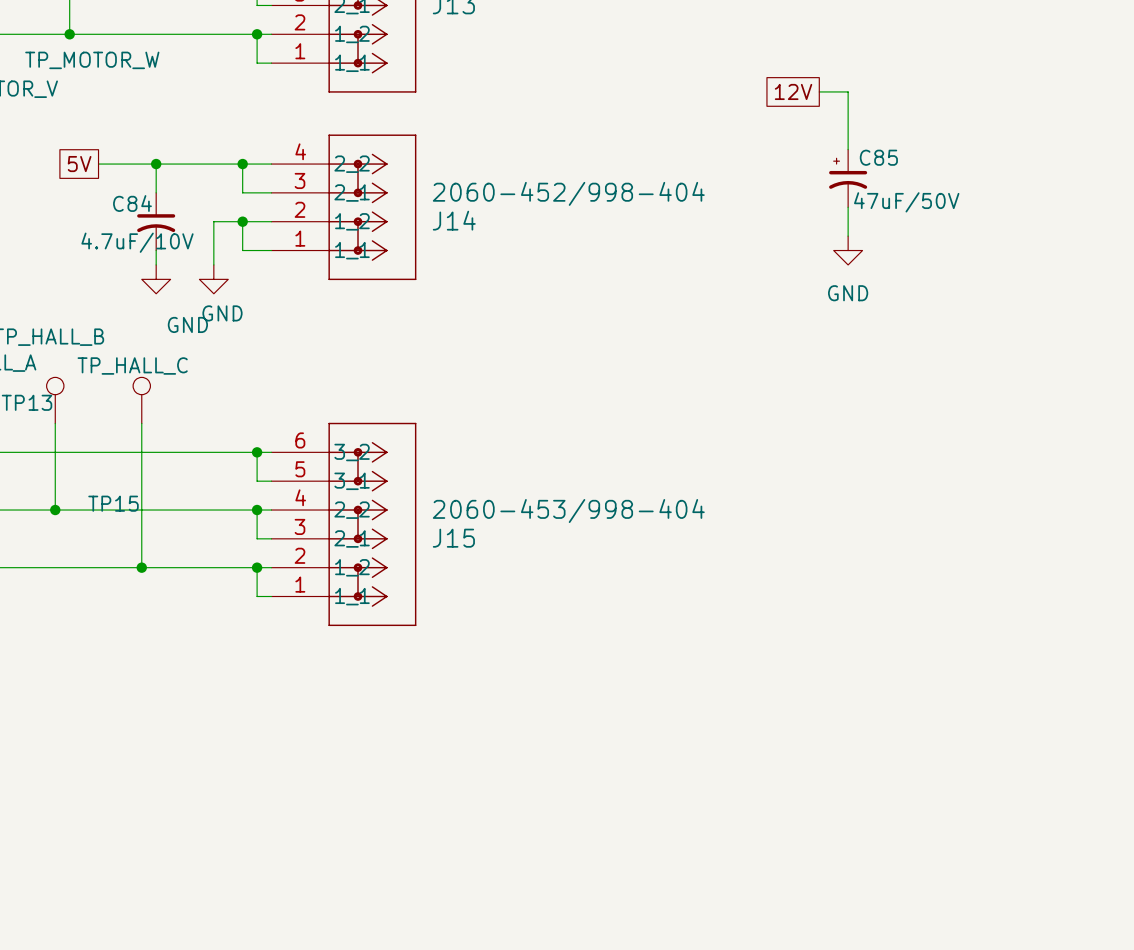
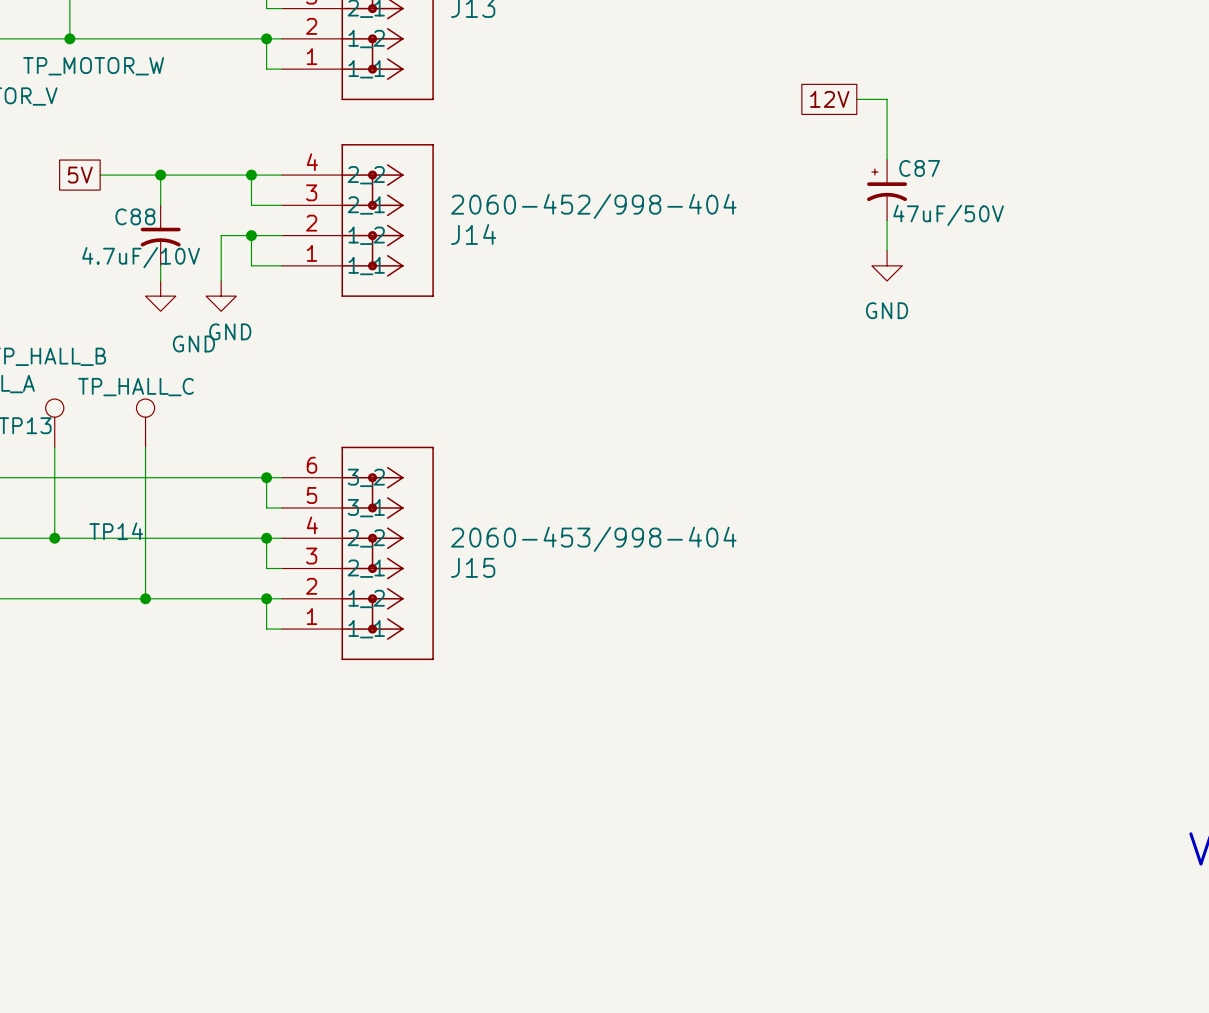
C85 name: C85 (878, 157) -> C87 (919, 168)
C84 name: C84 (132, 203) -> C88 (135, 216)
TP15 name: TP15 (113, 503) -> TP14 (116, 531)

